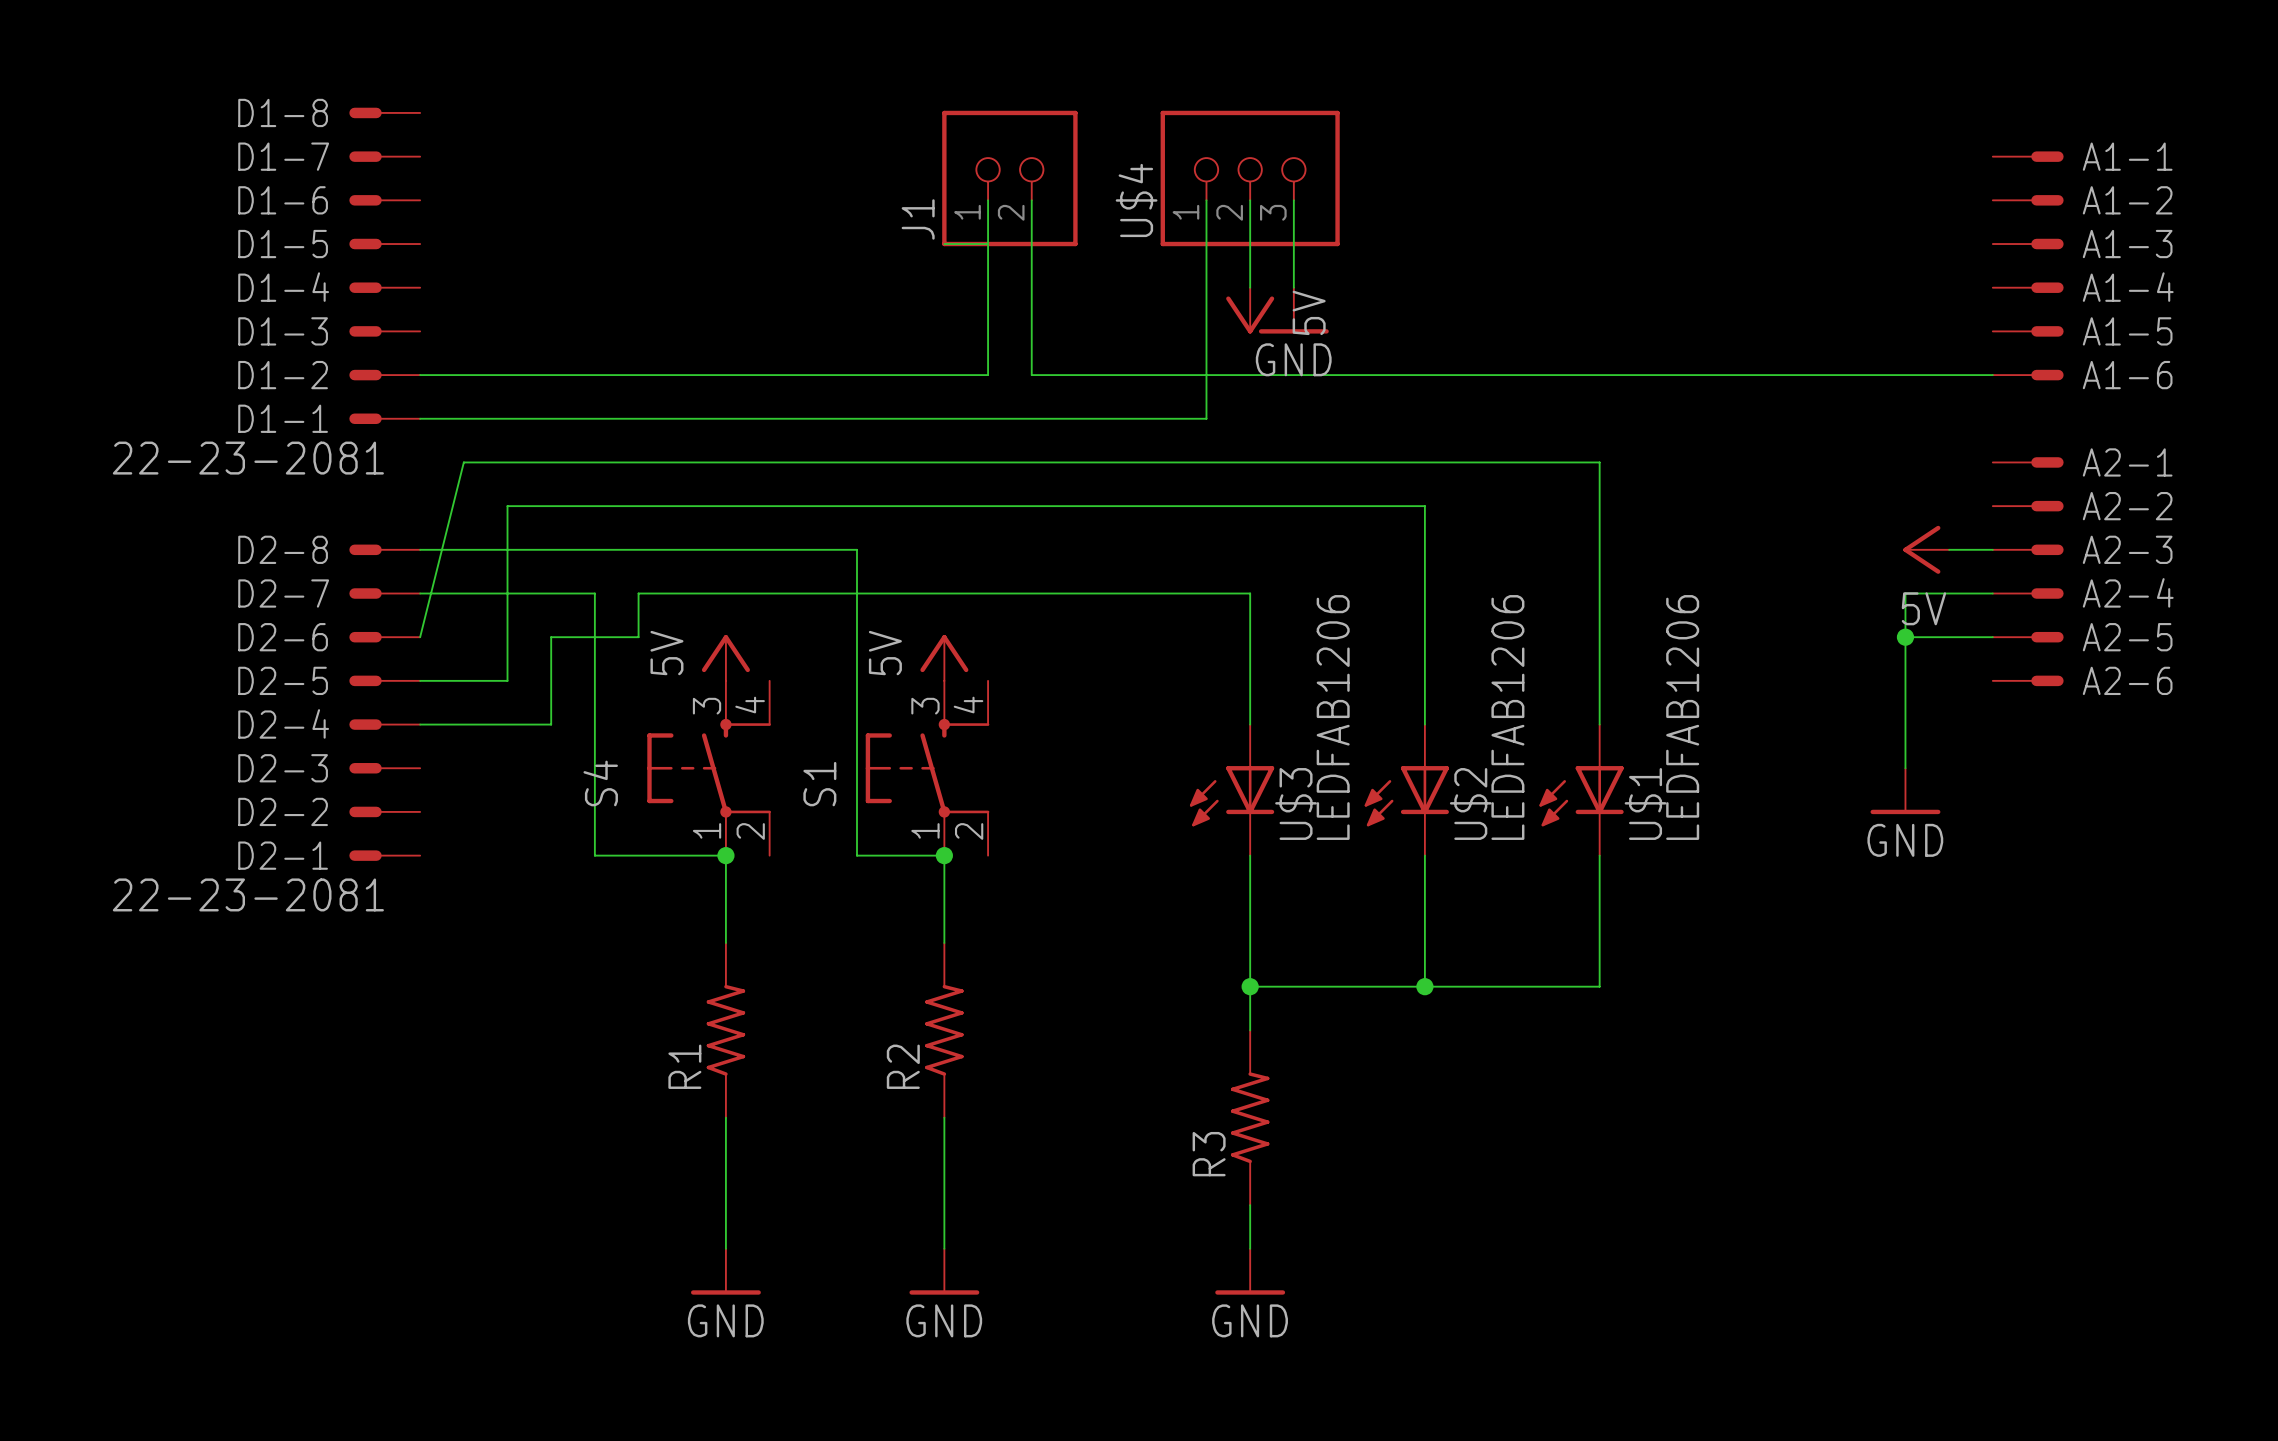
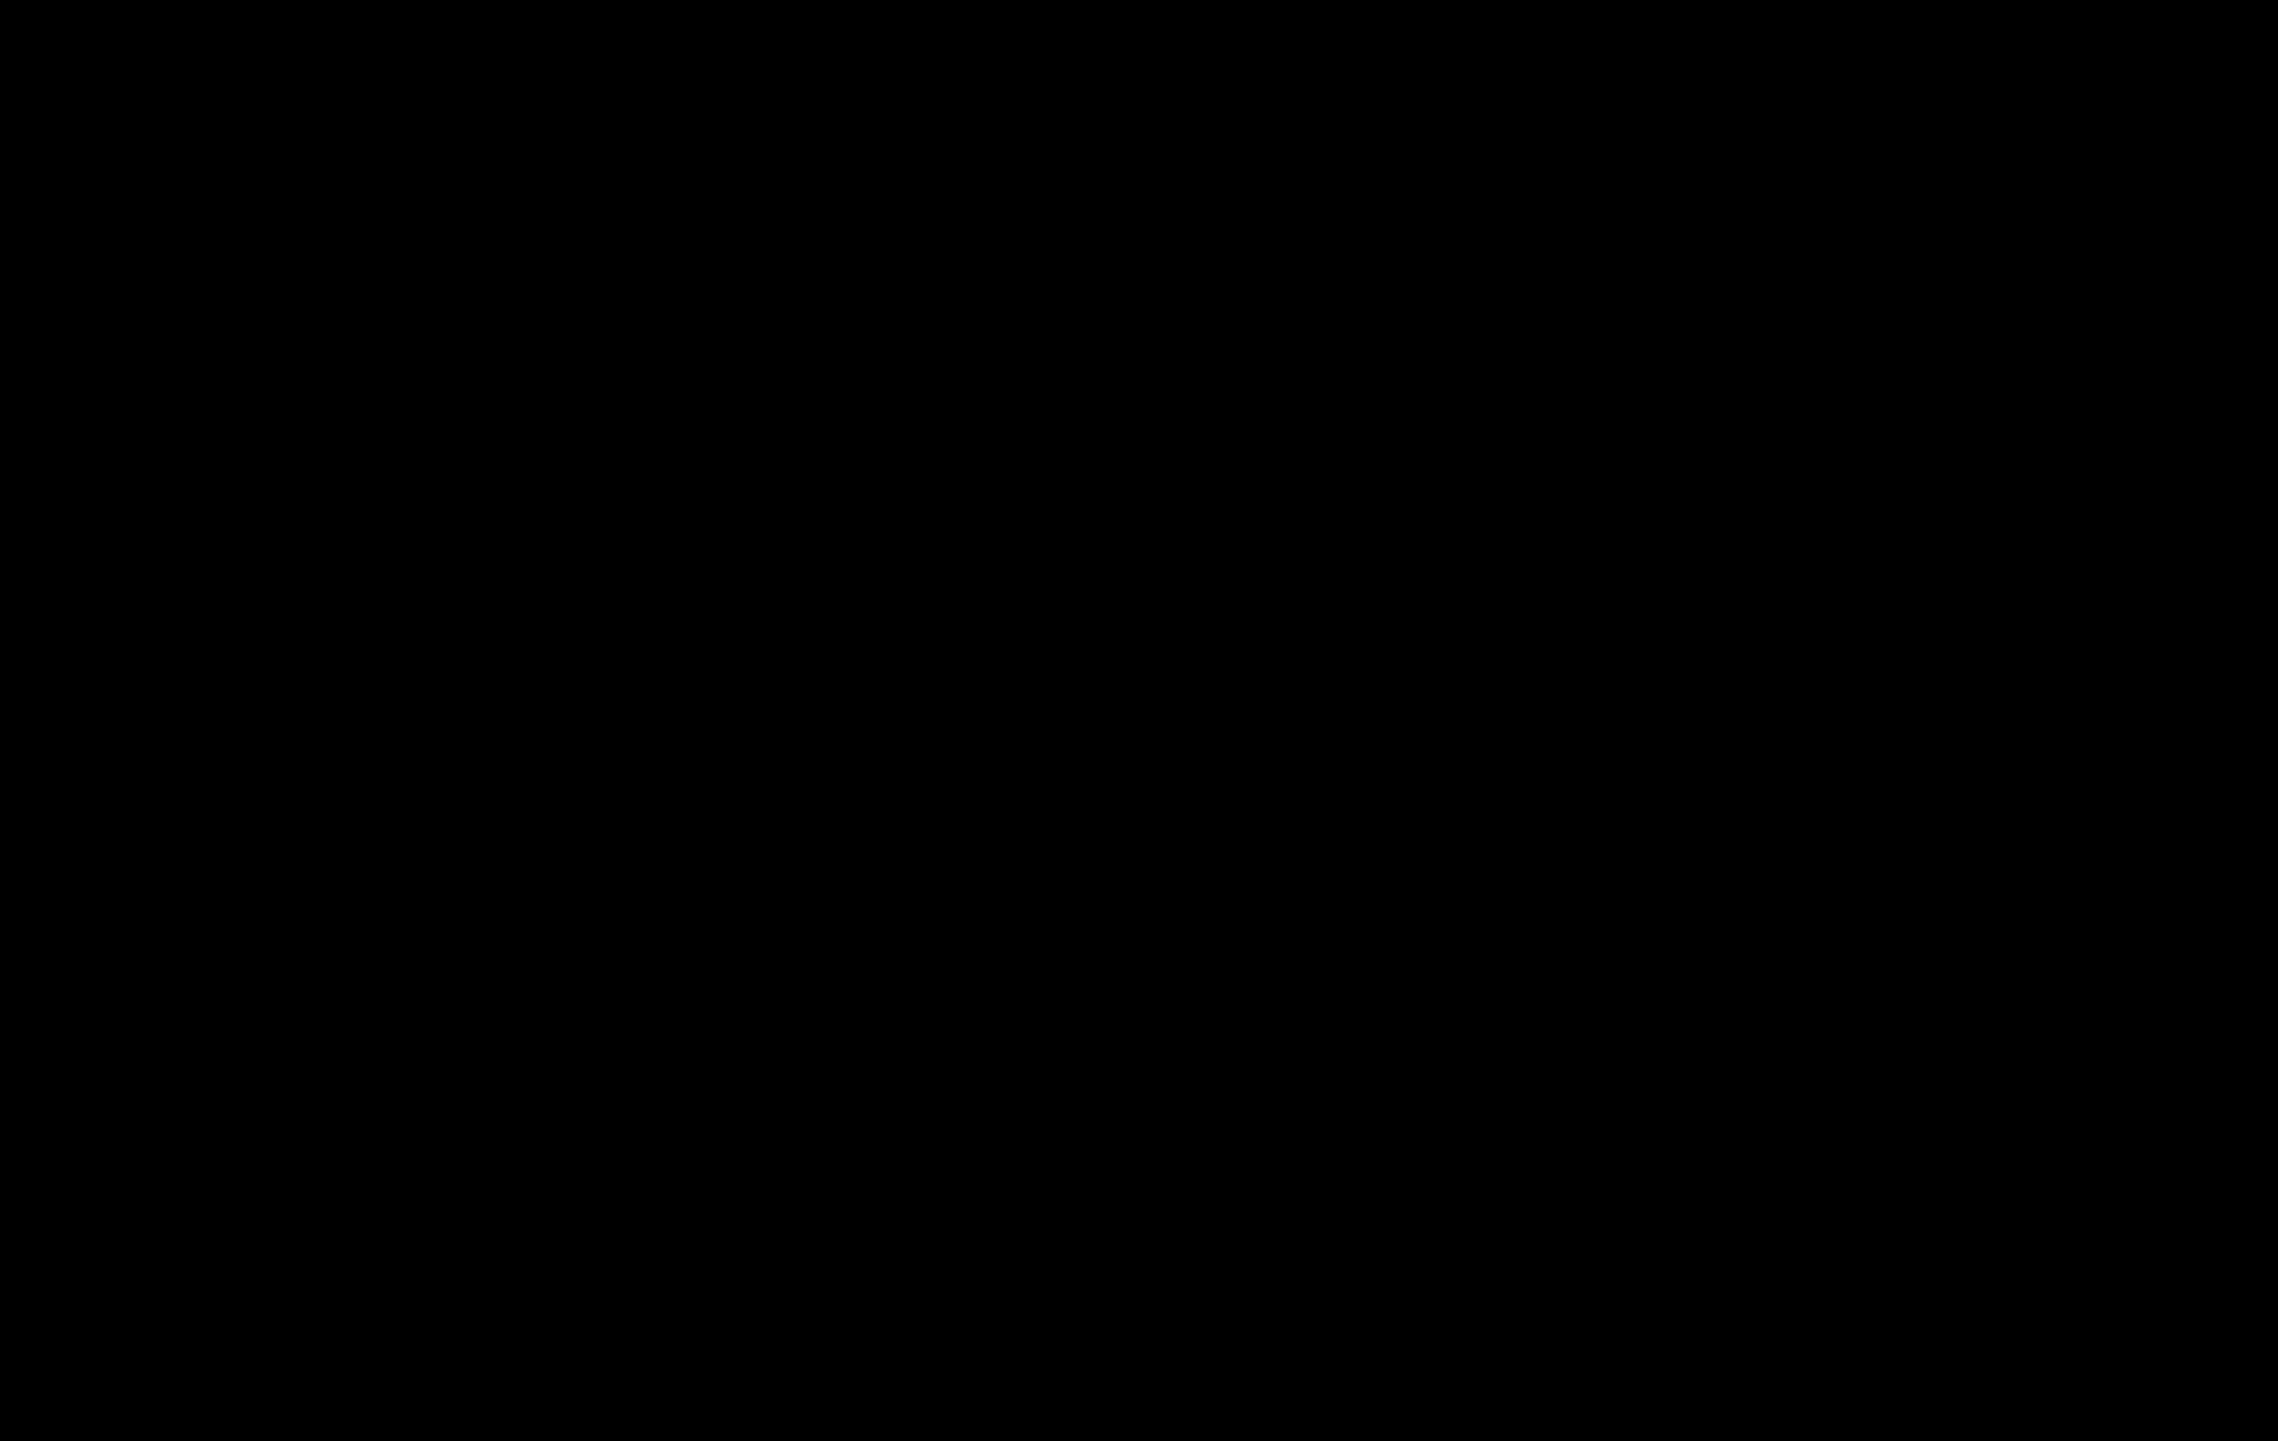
D1-8: (384, 112) -> none
D1-7: (384, 156) -> none
A1-1: (2028, 156) -> none
J1: (1009, 178) -> none
U$4: (1250, 178) -> none
D1-6: (384, 200) -> none
wire: (988, 200) (988, 375) (420, 375) -> none
wire: (1031, 200) (1031, 375) (1992, 375) -> none
wire: (1206, 200) (1206, 418) (420, 418) -> none
wire: (1250, 200) (1250, 287) -> none
wire: (1293, 200) (1293, 287) -> none
A1-2: (2028, 200) -> none
D1-5: (384, 244) -> none
wire: (944, 244) (988, 244) -> none
A1-3: (2028, 244) -> none
D1-4: (384, 287) -> none
A1-4: (2028, 287) -> none
power symbol: 5V (1250, 310) -> none
power symbol: GND (1293, 310) -> none
D1-3: (384, 331) -> none
A1-5: (2028, 331) -> none
D1-2: (384, 375) -> none
A1-6: (2028, 375) -> none
D1-1: 22-23-2081 (384, 418) -> none
A2-1: (2028, 462) -> none
A2-2: (2028, 506) -> none
D2-8: (384, 549) -> none
wire: (420, 549) (856, 549) (856, 855) (944, 855) (944, 942) -> none
power symbol: 5V (1926, 549) -> none
wire: (1949, 549) (1992, 549) -> none
A2-3: (2028, 549) -> none
D2-7: (384, 593) -> none
wire: (420, 593) (594, 593) (594, 855) (725, 855) (725, 942) -> none
wire: (1992, 593) (1905, 593) (1905, 768) -> none
A2-4: (2028, 593) -> none
D2-6: (384, 637) -> none
wire: (420, 637) (463, 462) (1599, 462) (1599, 724) -> none
wire: (1905, 637) (1992, 637) -> none
junction: (1905, 637) -> none
A2-5: (2028, 637) -> none
power symbol: 5V (725, 657) -> none
power symbol: 5V (944, 657) -> none
D2-5: (384, 680) -> none
wire: (420, 680) (507, 680) (507, 506) (1424, 506) (1424, 724) -> none
A2-6: (2028, 680) -> none
D2-4: (384, 724) -> none
wire: (420, 724) (551, 724) (551, 637) (638, 637) (638, 593) (1250, 593) (1250, 724) -> none
D2-3: (384, 768) -> none
S4: (709, 768) -> none
S1: (927, 768) -> none
U$3: LEDFAB1206 (1232, 790) -> none
U$2: LEDFAB1206 (1406, 790) -> none
U$1: LEDFAB1206 (1581, 790) -> none
power symbol: GND (1905, 791) -> none
D2-2: (384, 811) -> none
D2-1: 22-23-2081 (384, 855) -> none
junction: (725, 855) -> none
junction: (944, 855) -> none
wire: (1250, 855) (1250, 1030) -> none
wire: (1424, 855) (1424, 986) -> none
wire: (1599, 855) (1599, 986) (1250, 986) -> none
junction: (1250, 986) -> none
junction: (1424, 986) -> none
R1: (725, 1030) -> none
R2: (944, 1030) -> none
wire: (725, 1117) (725, 1248) -> none
wire: (944, 1117) (944, 1248) -> none
R3: (1250, 1117) -> none
wire: (1250, 1205) (1250, 1248) -> none
power symbol: GND (725, 1271) -> none
power symbol: GND (944, 1271) -> none
power symbol: GND (1250, 1271) -> none

